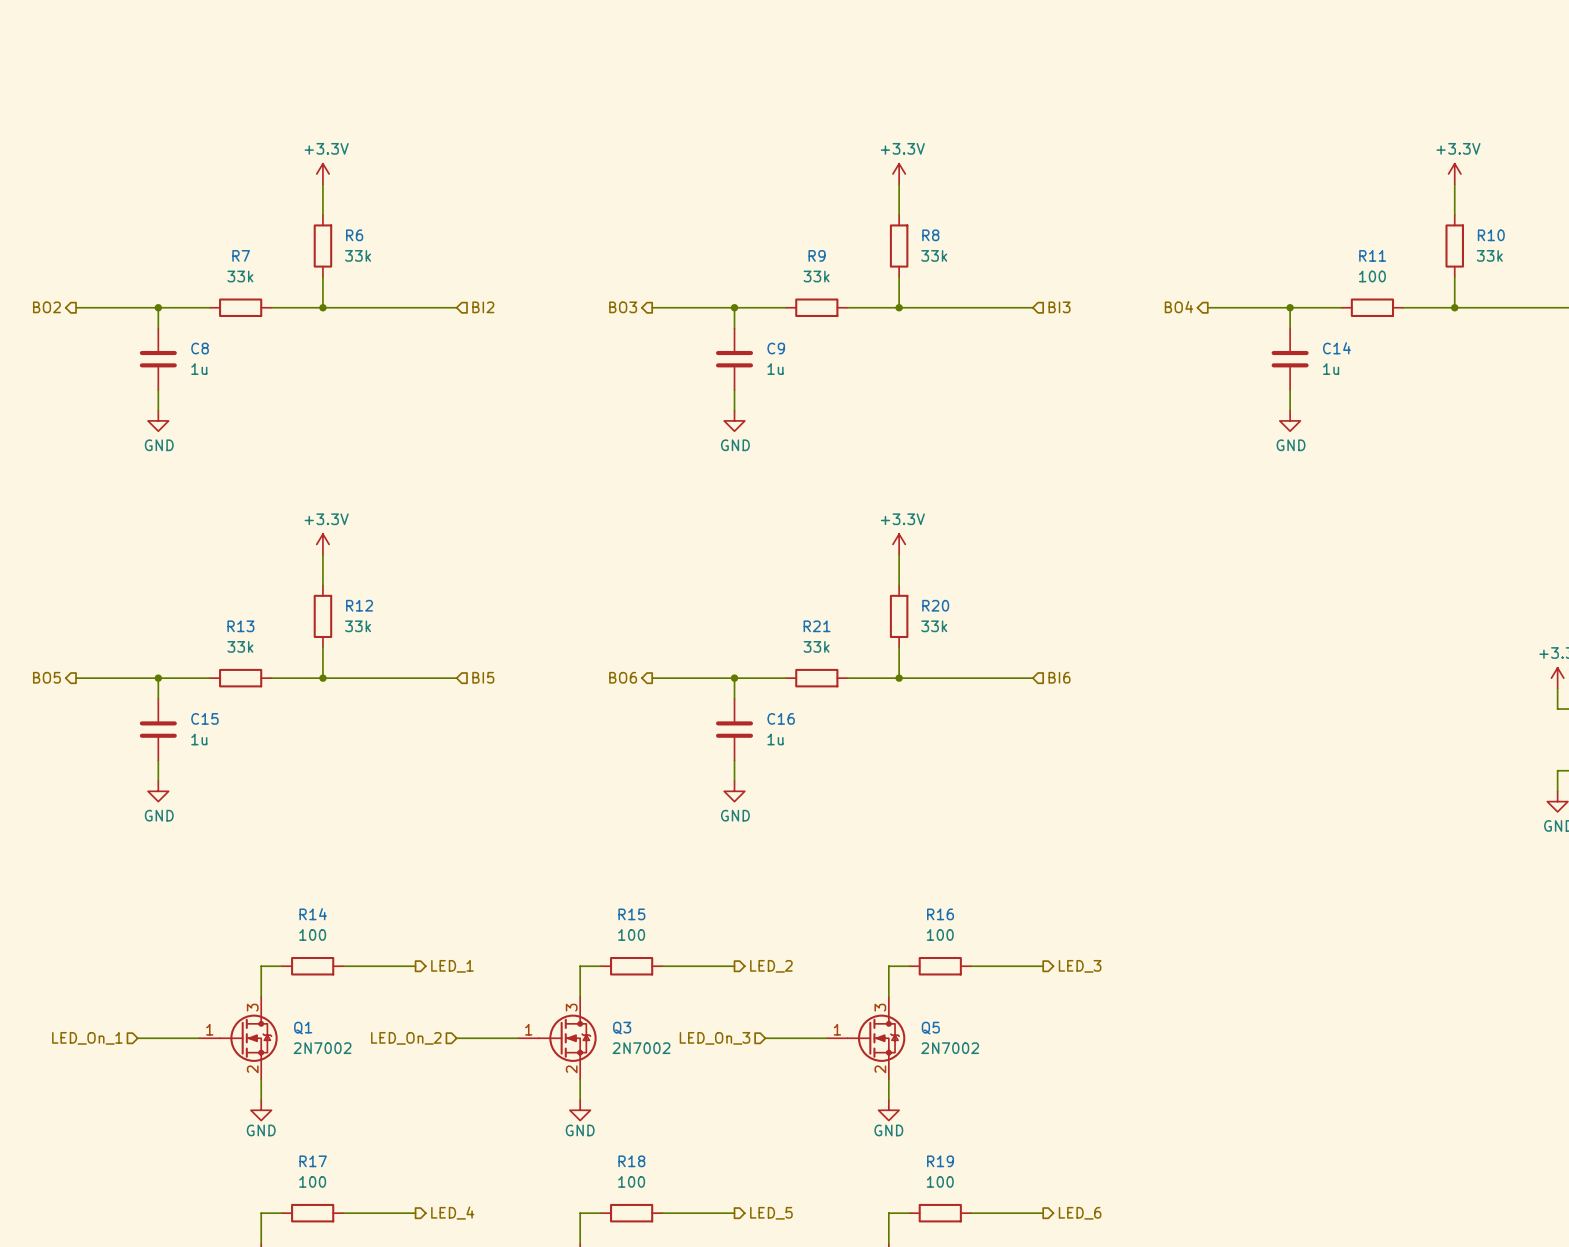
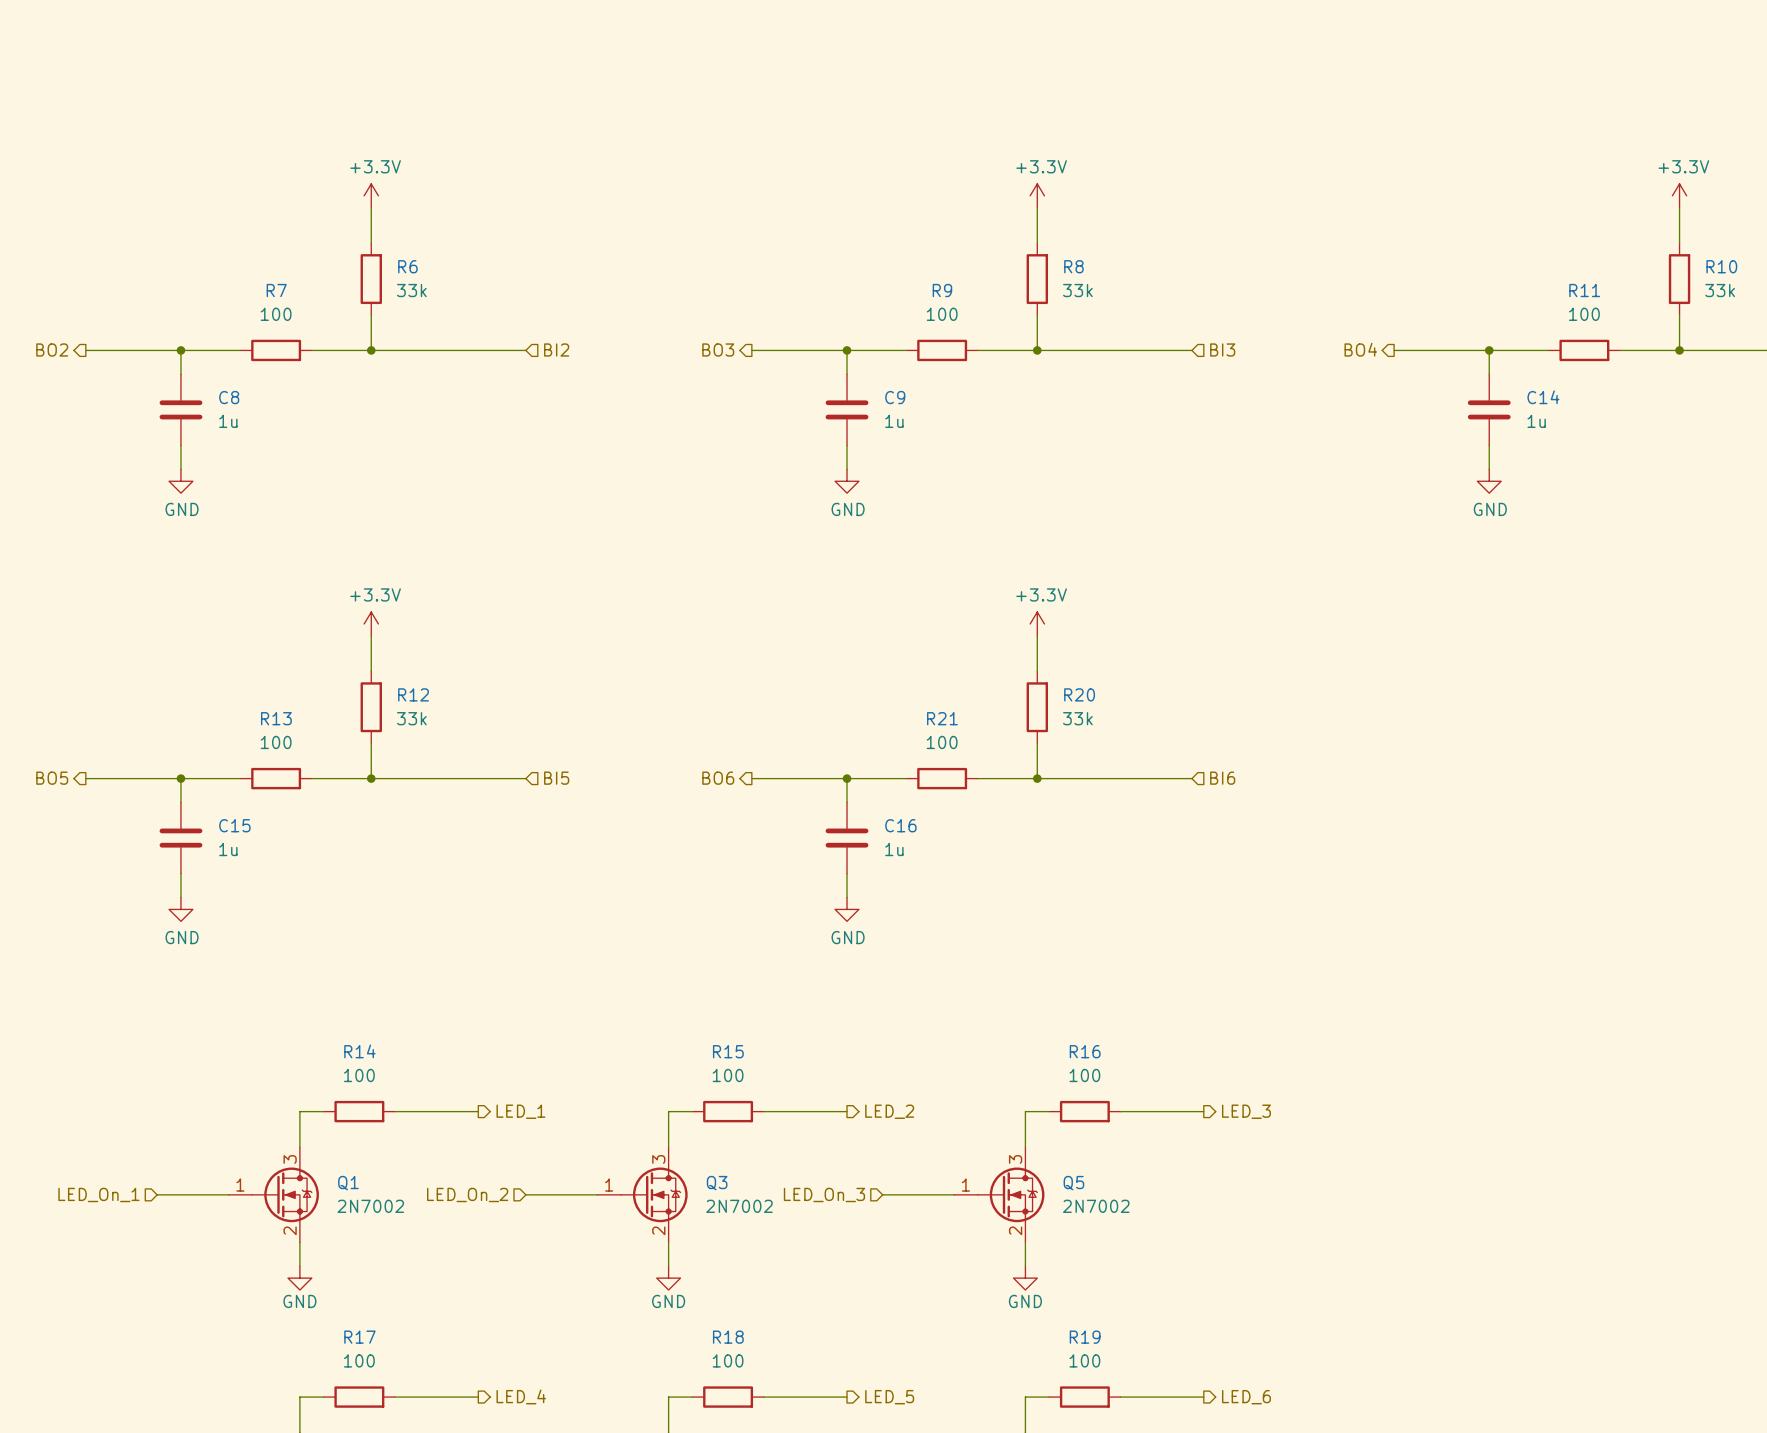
R7 value: 33k (240, 276) -> 100 (276, 314)
R9 value: 33k (816, 276) -> 100 (942, 314)
R13 value: 33k (240, 646) -> 100 (276, 742)
R21 value: 33k (816, 646) -> 100 (942, 742)

